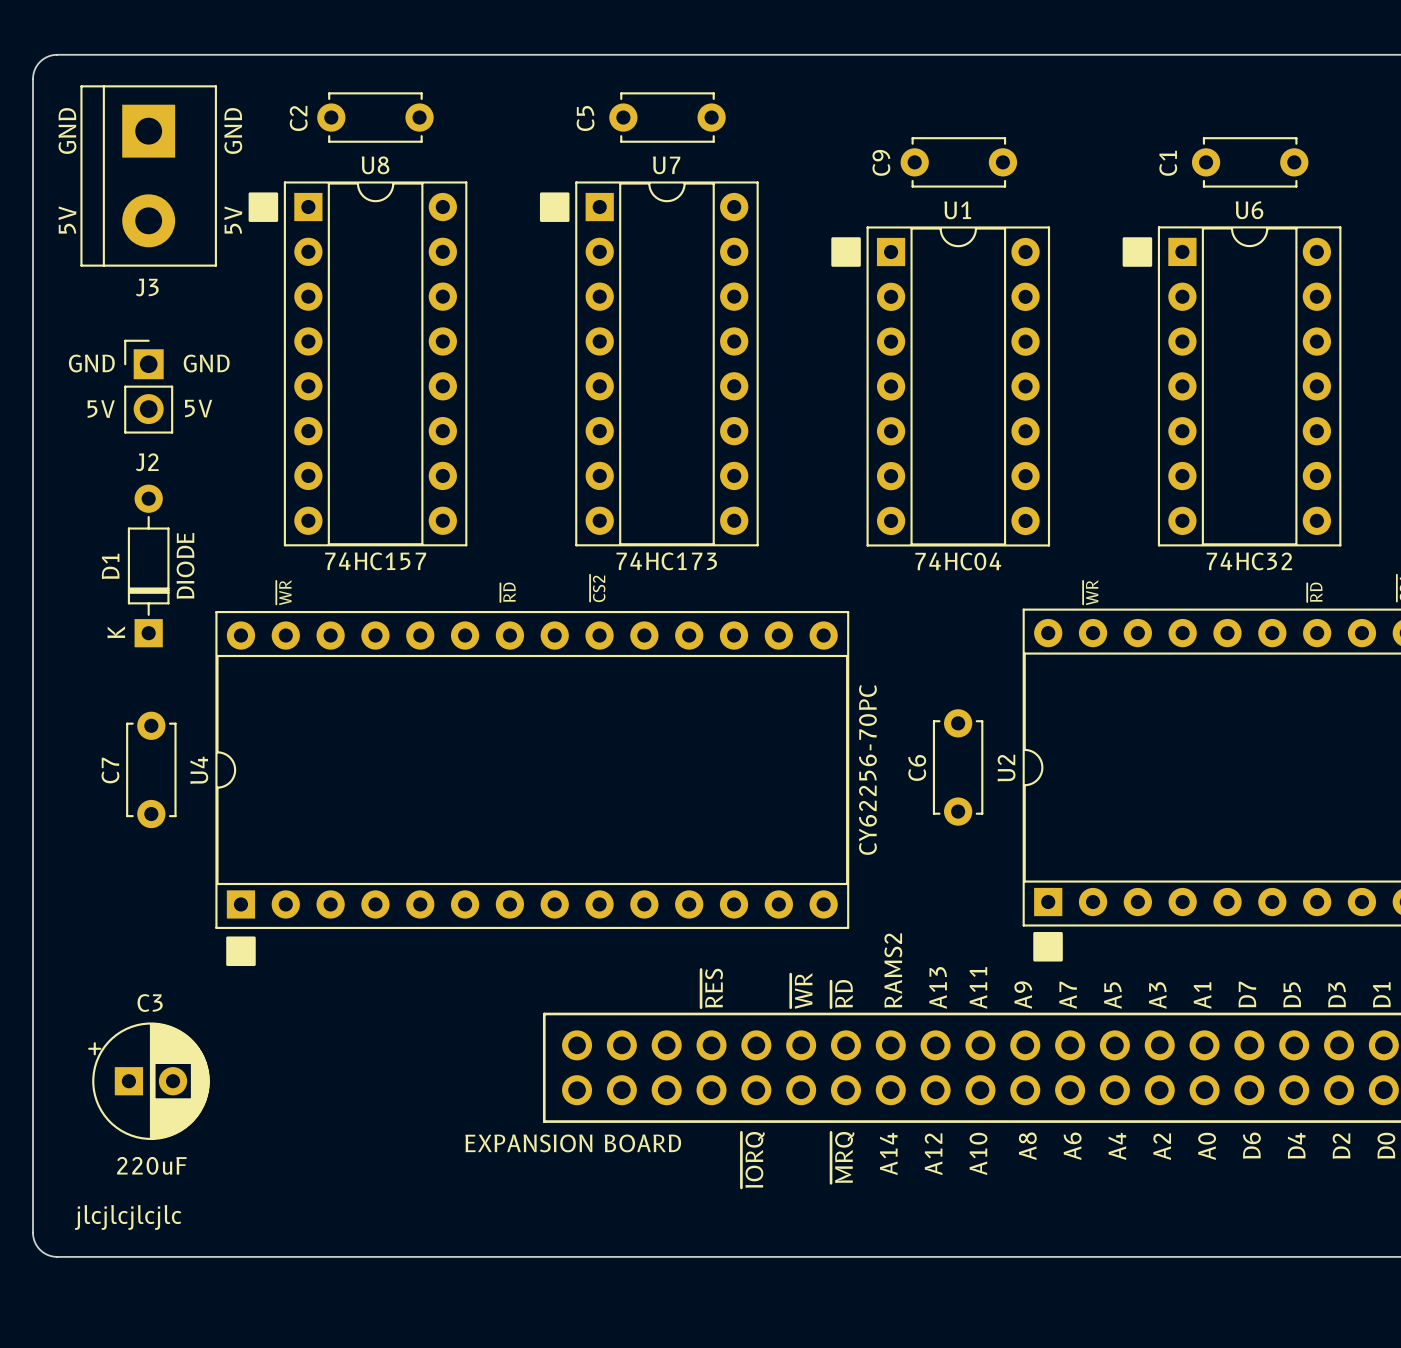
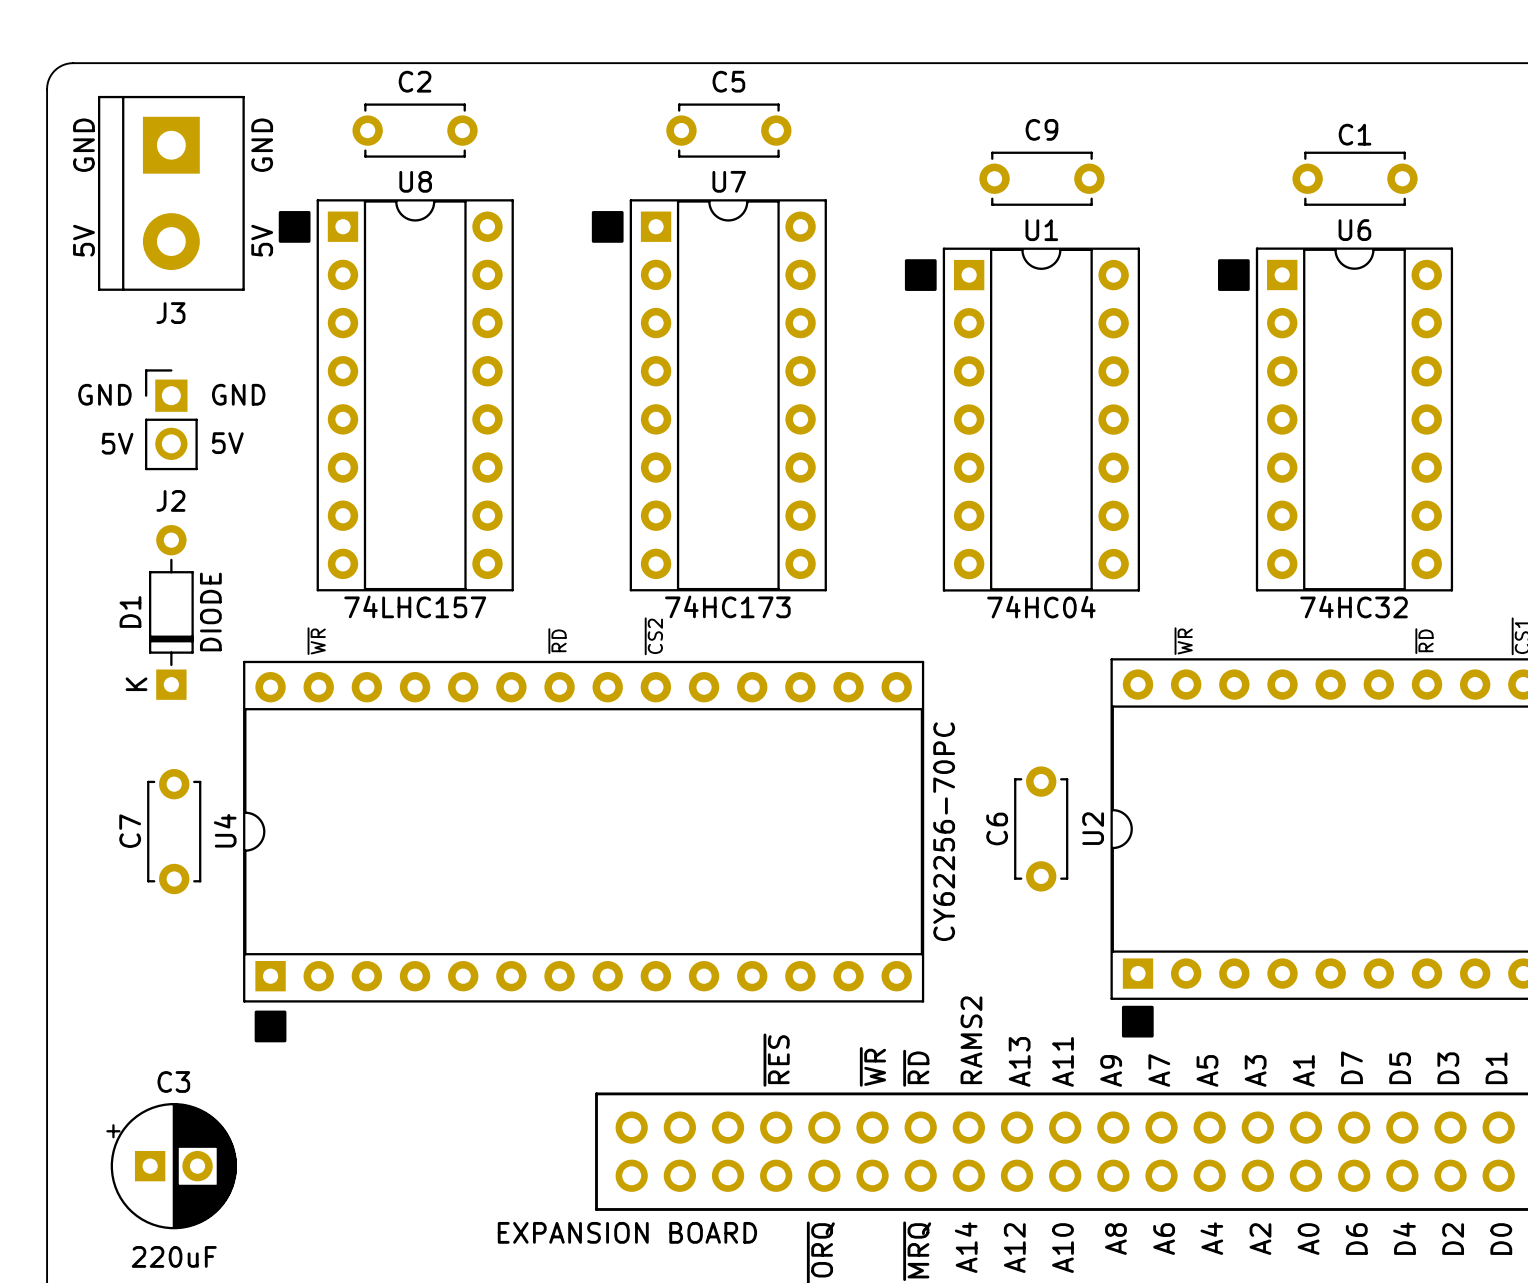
C2 name rotation: 0° (298, 118) -> 90° clockwise (415, 81)
C2 name position: C2 (298, 118) -> C2 (415, 81)
C5 name rotation: 0° (585, 118) -> 90° clockwise (728, 81)
C5 name position: C5 (585, 118) -> C5 (728, 81)
C9 name rotation: 0° (881, 162) -> 90° clockwise (1041, 129)
C9 name position: C9 (881, 162) -> C9 (1041, 129)
C1 name rotation: 0° (1168, 163) -> 90° clockwise (1355, 134)
C1 name position: C1 (1168, 163) -> C1 (1355, 134)
U8 value: 74HC157 (375, 561) -> 74LHC157 (415, 606)

